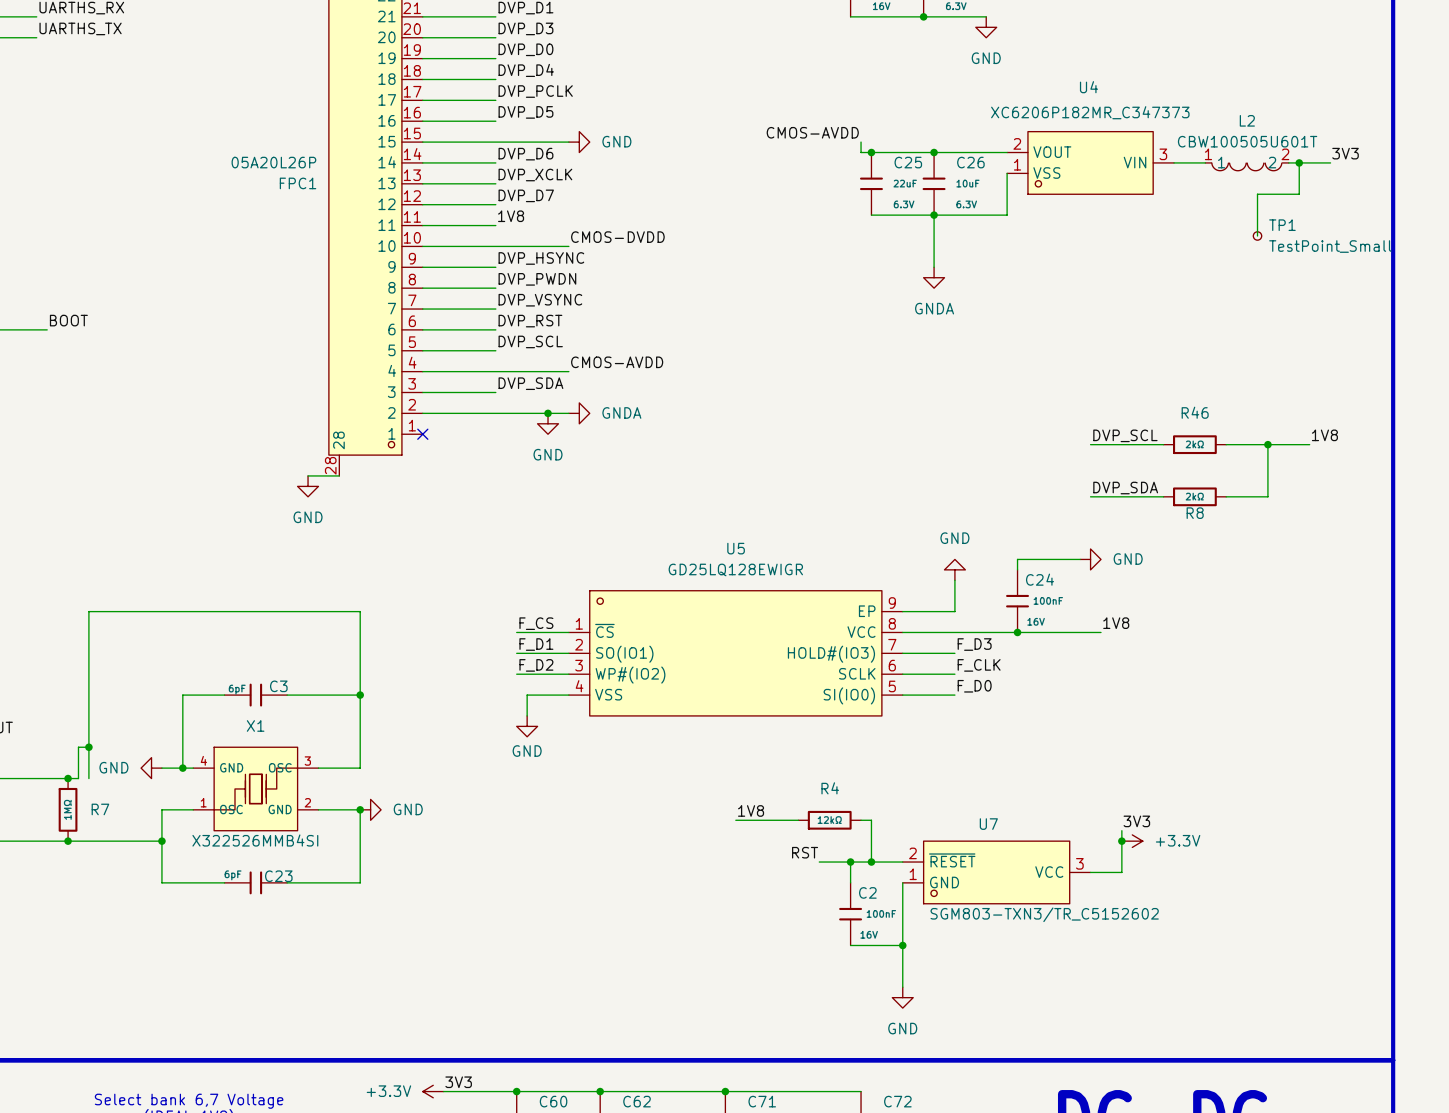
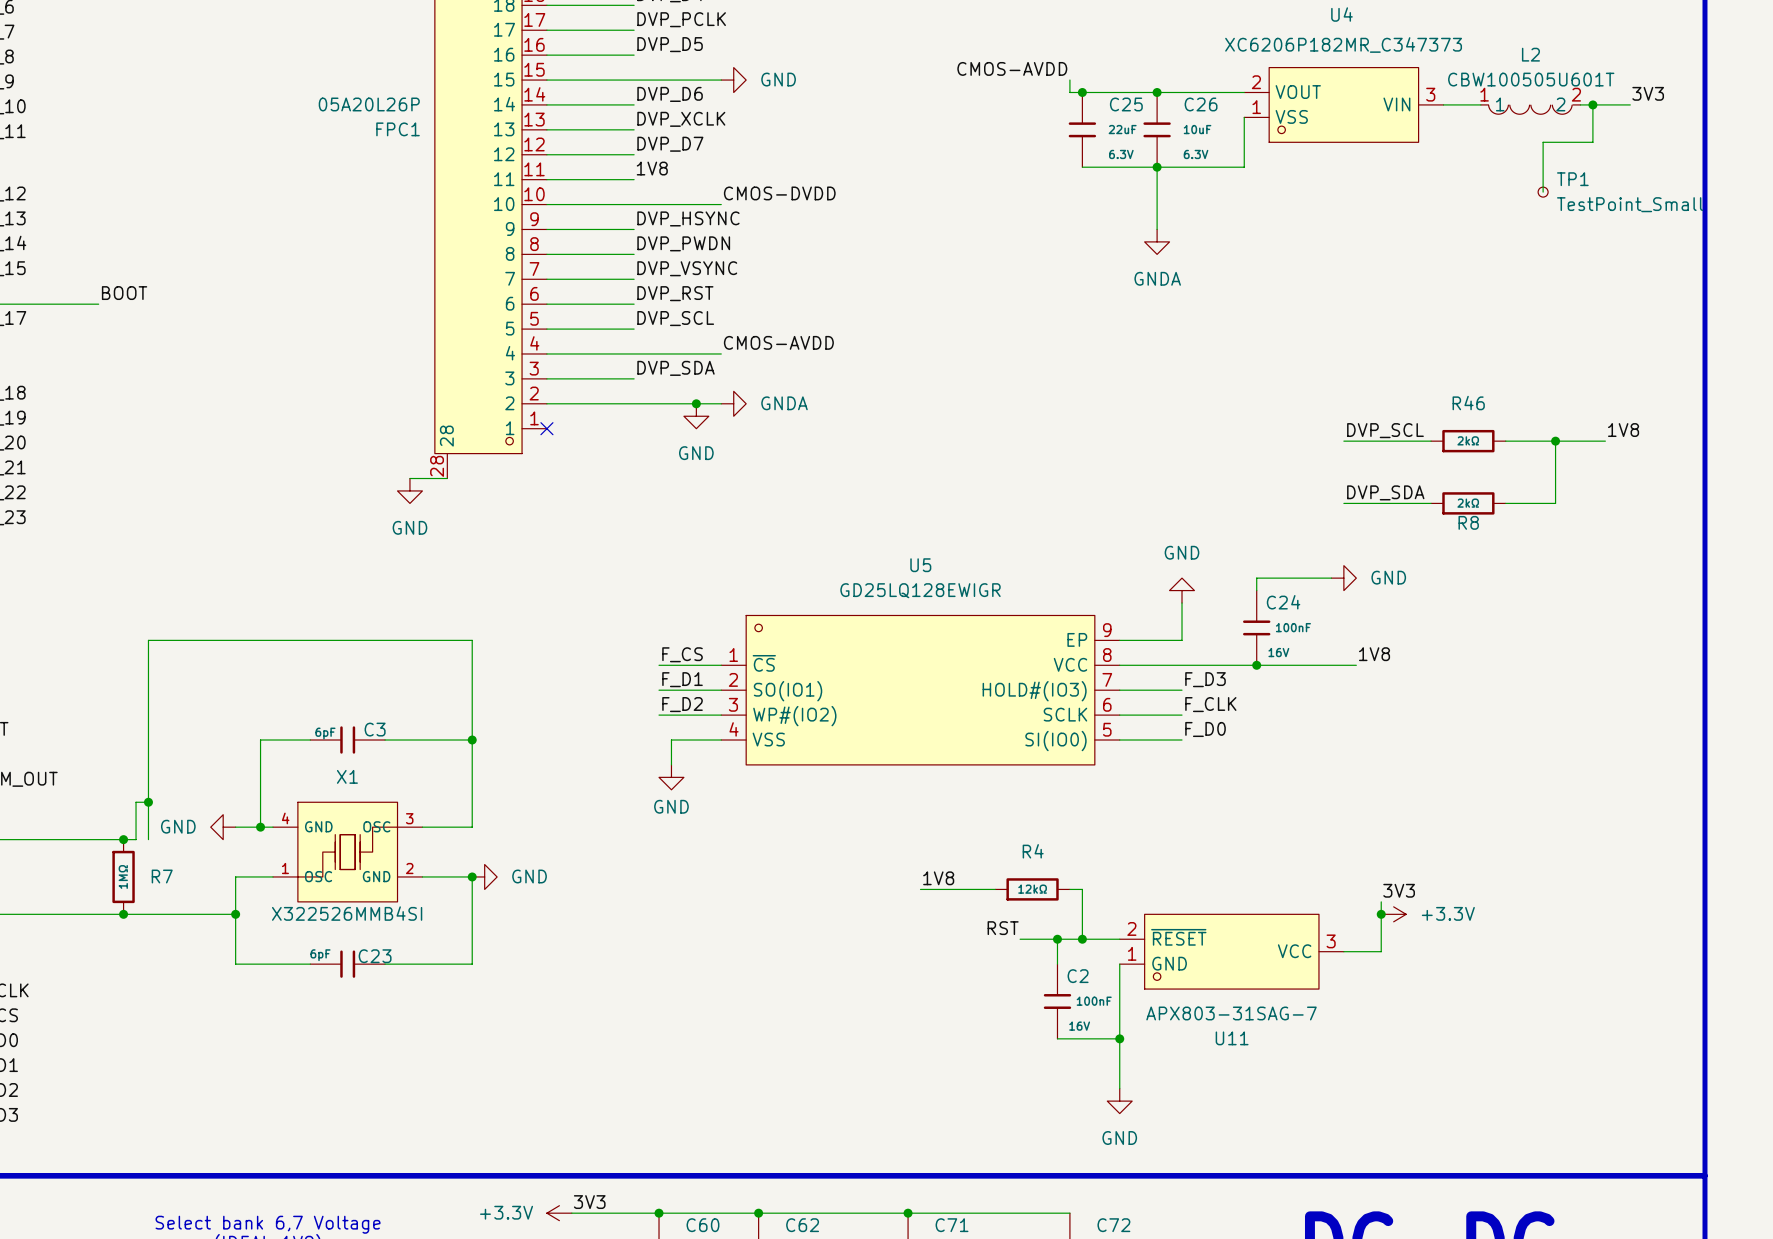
U7 name: U7 (988, 824) -> U11 (1232, 1038)
U7 value: SGM803-TXN3/TR_C5152602 (1044, 914) -> APX803-31SAG-7 (1231, 1013)

